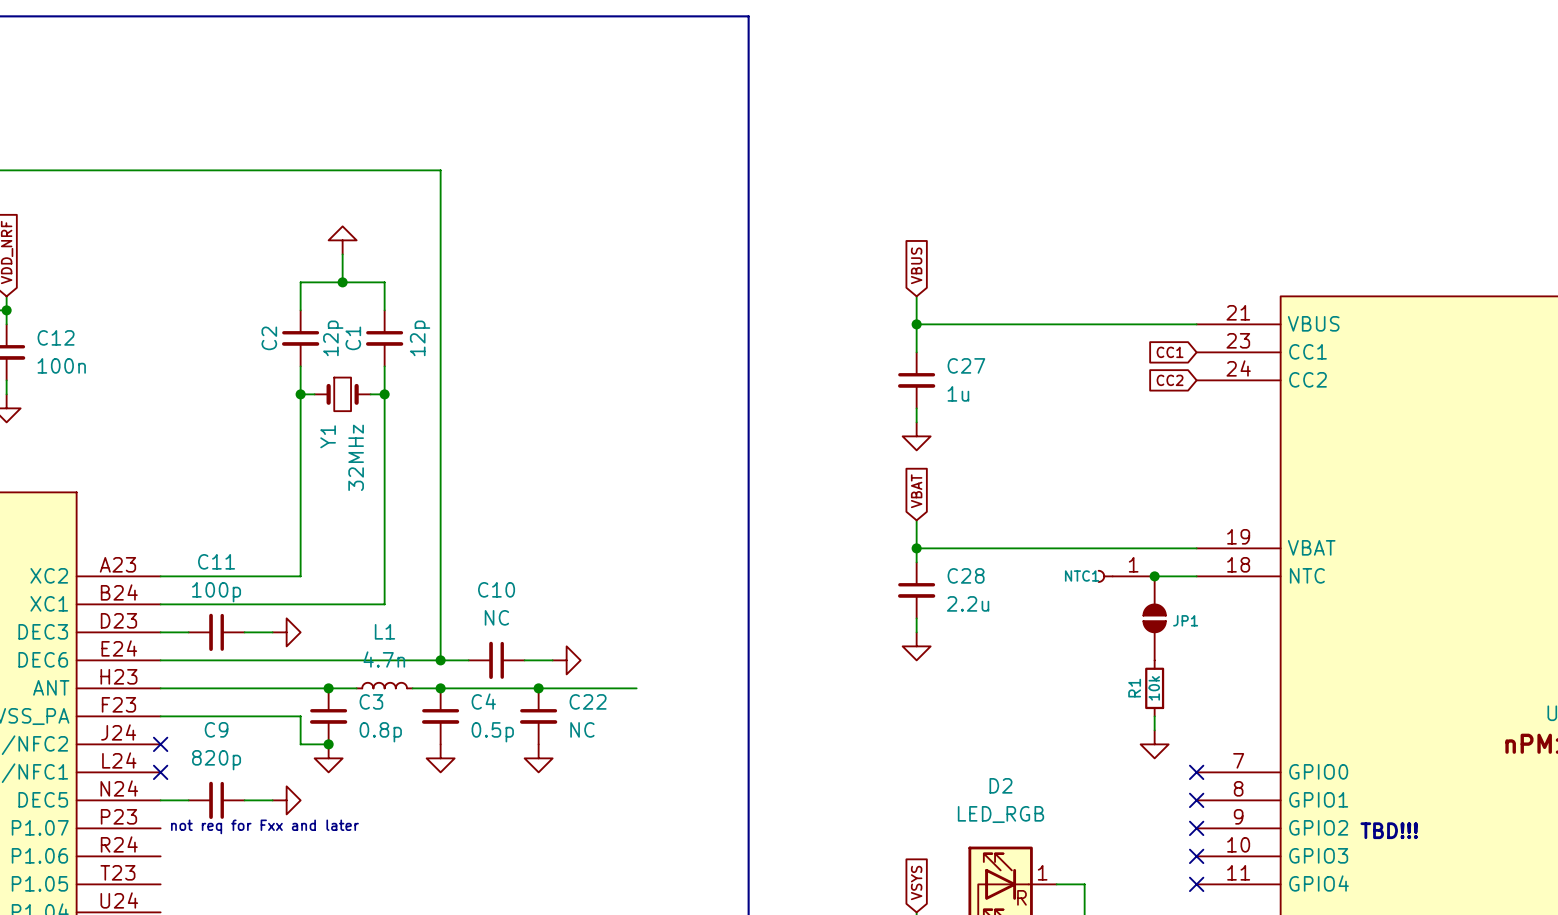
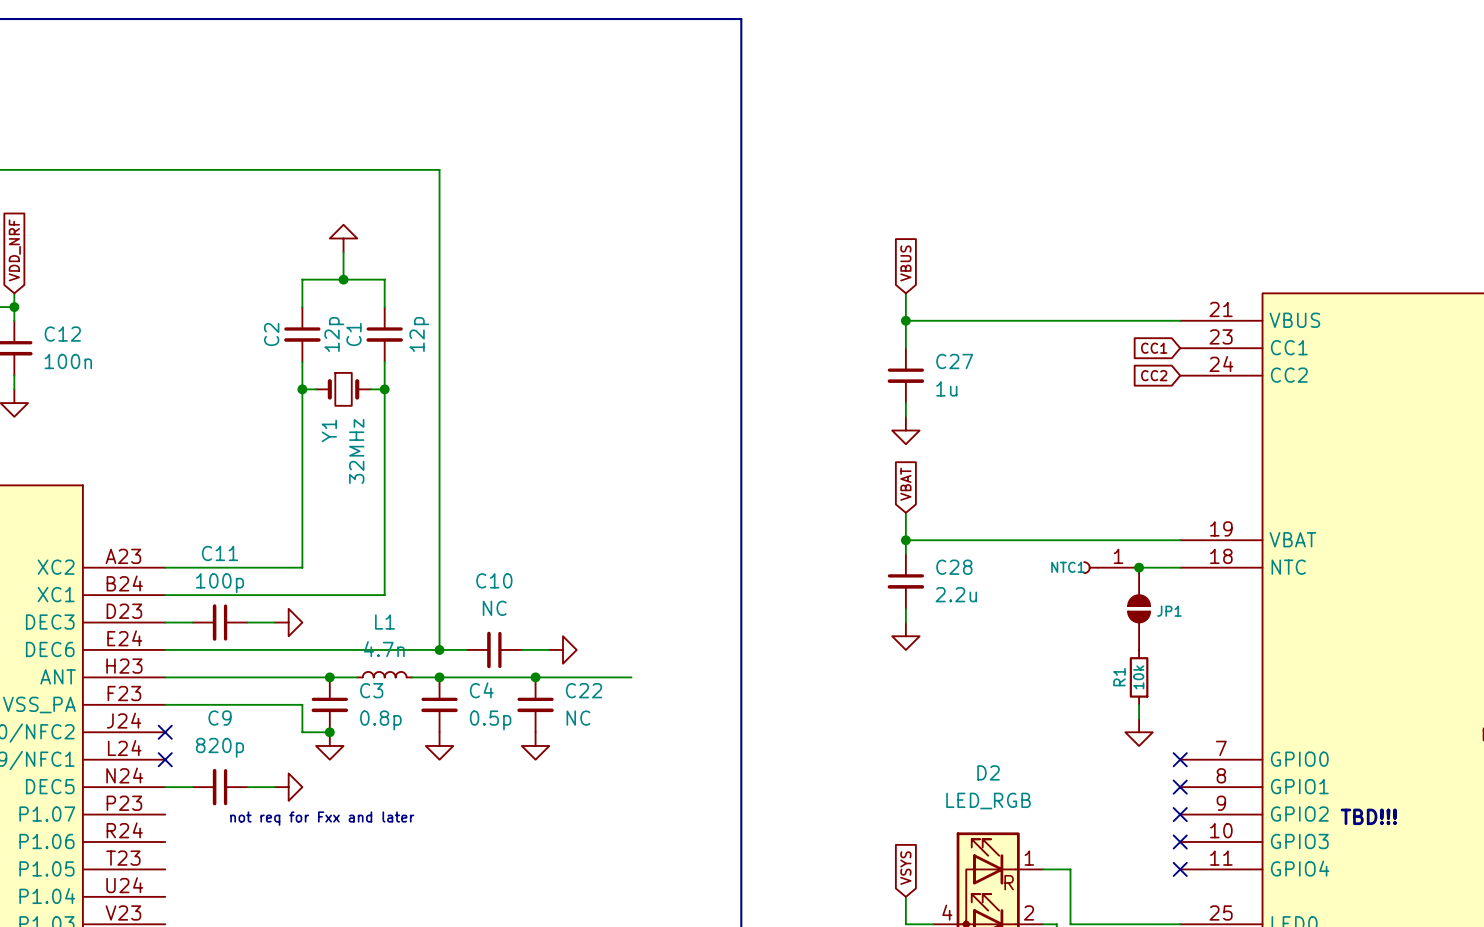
text position: not req for Fxx and later (264, 826) -> not req for Fxx and later (322, 818)

